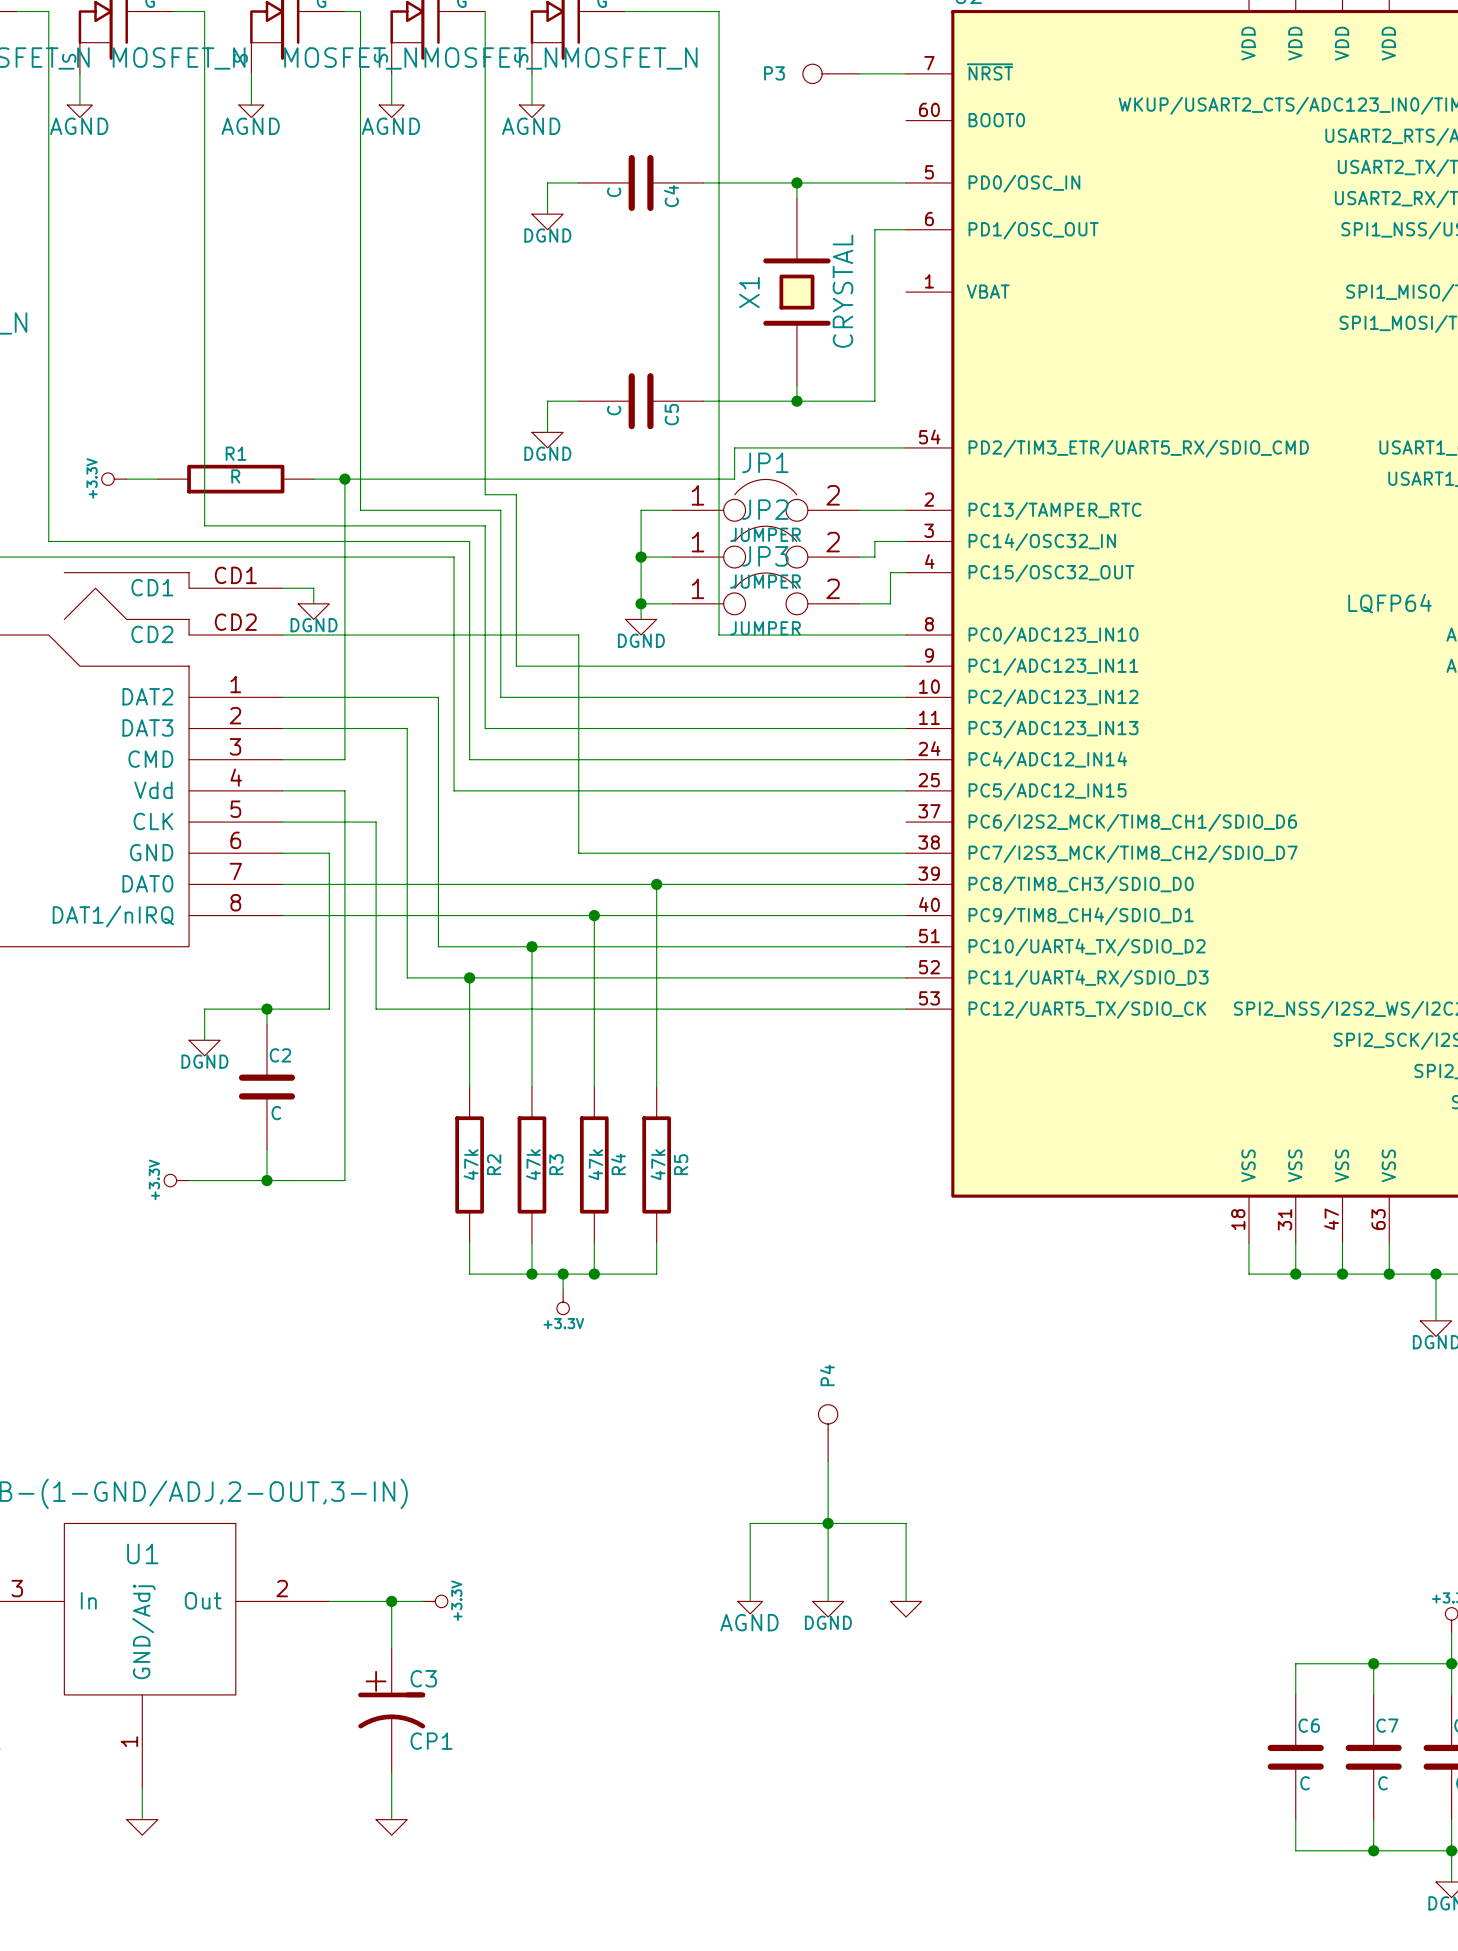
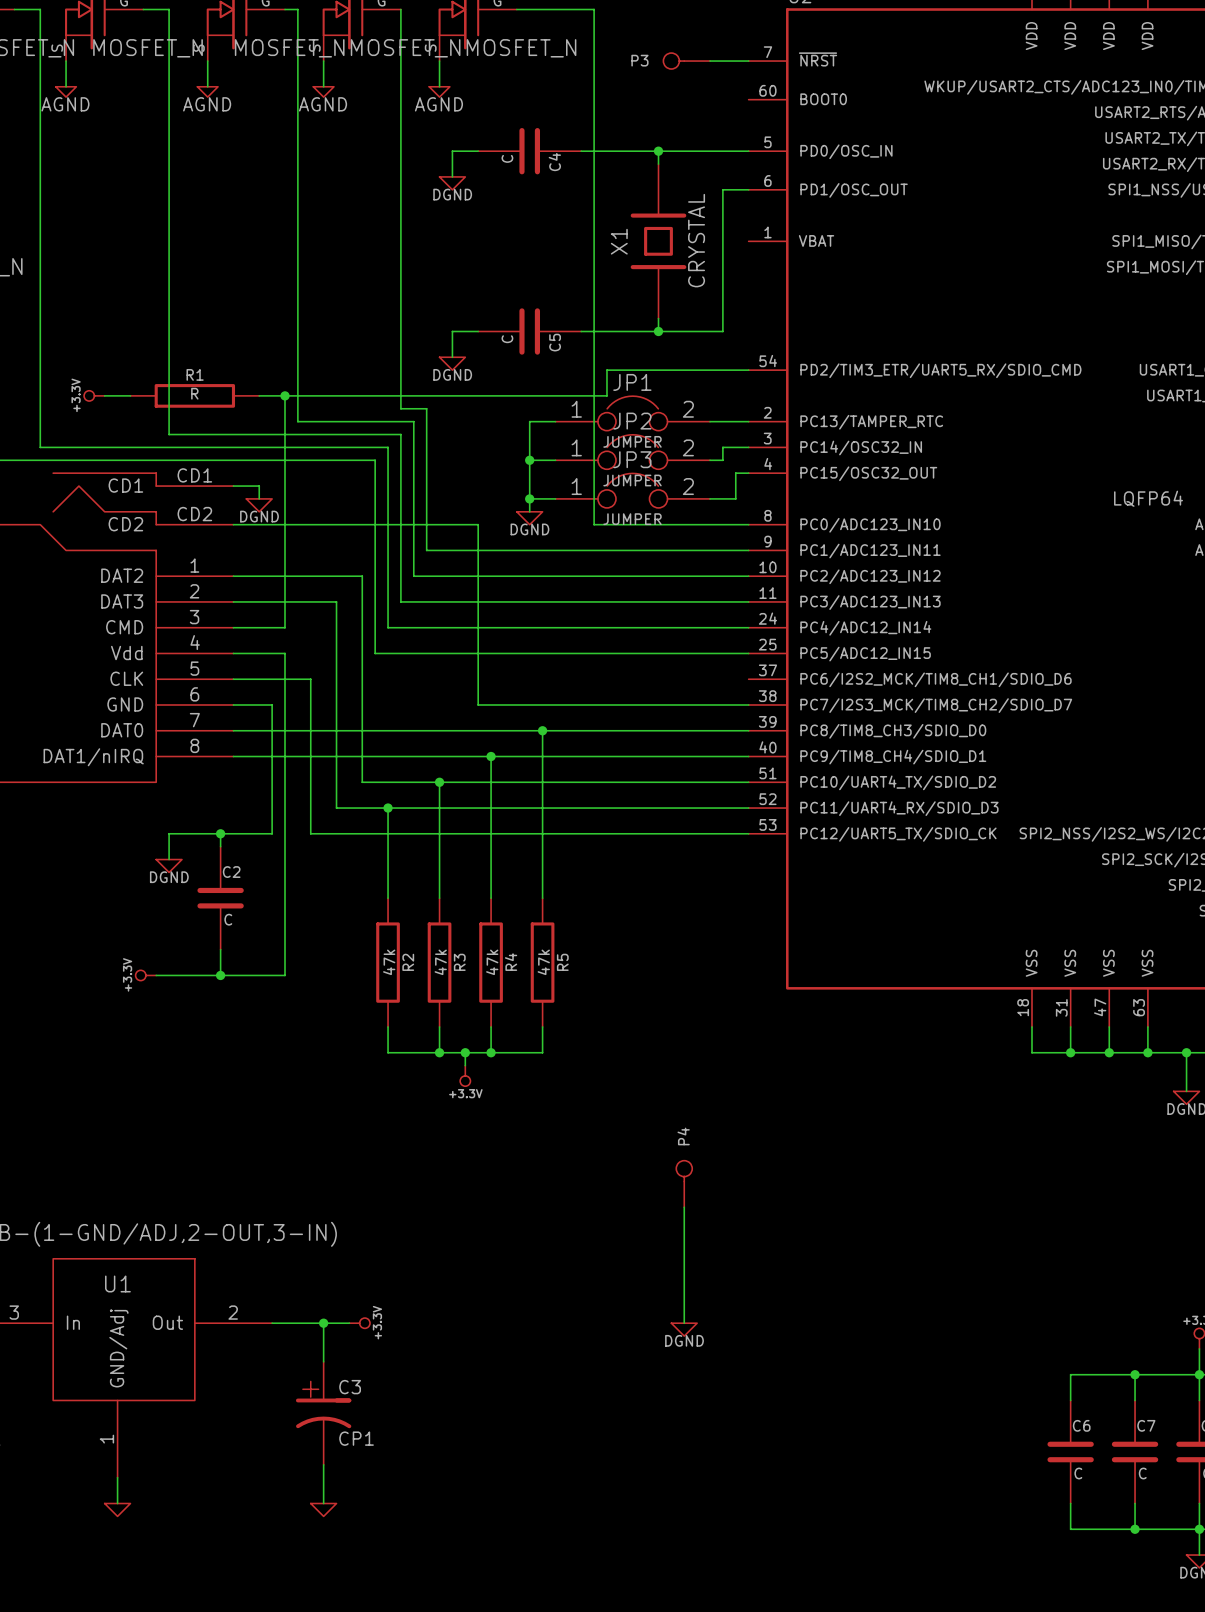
junction: (828, 1523) -> none
wire: (750, 1601) (750, 1523) (906, 1523) (906, 1601) -> none
power symbol: AGND (750, 1607) -> none
power symbol: (906, 1609) -> none

